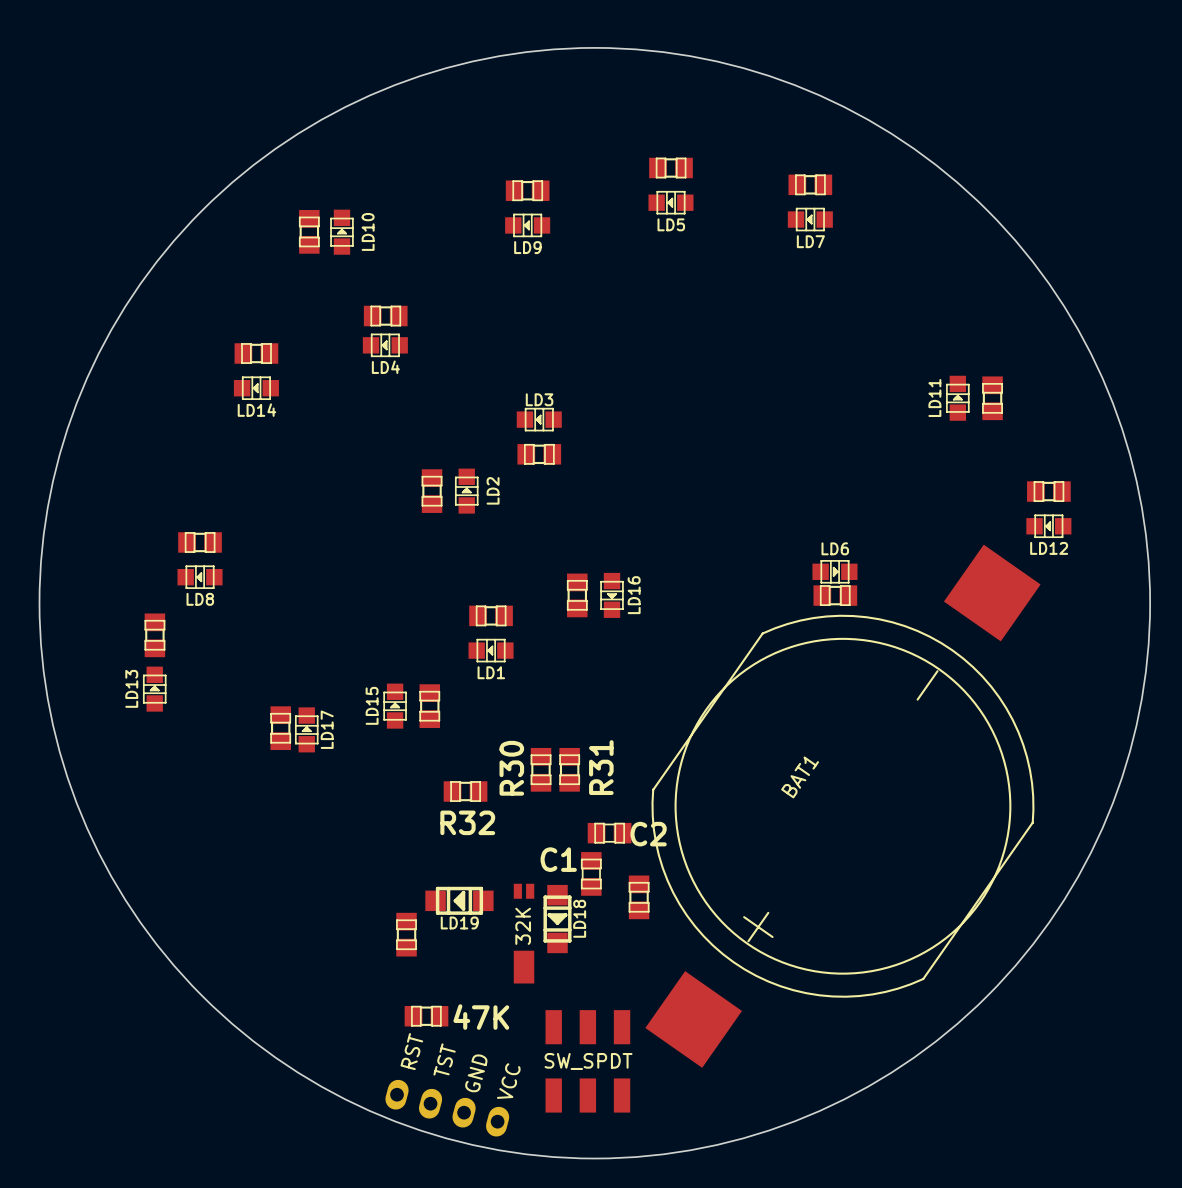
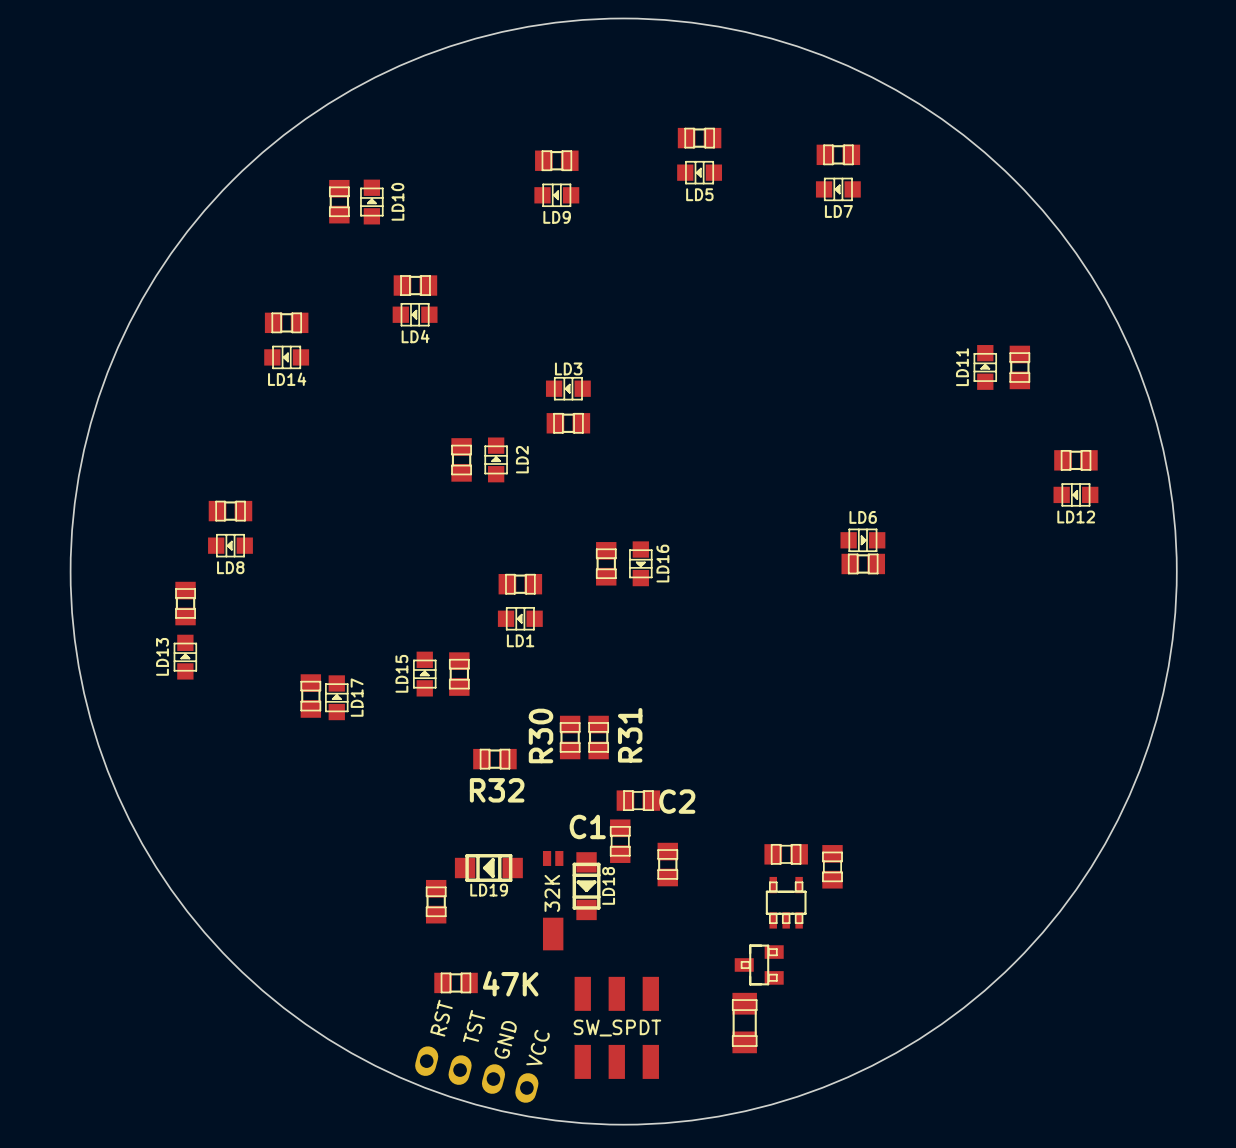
BAT1: (842, 806) -> none
part: none -> (786, 854)
part: none -> (832, 866)
part: none -> (786, 902)
part: none -> (759, 964)
part: none -> (744, 1023)

